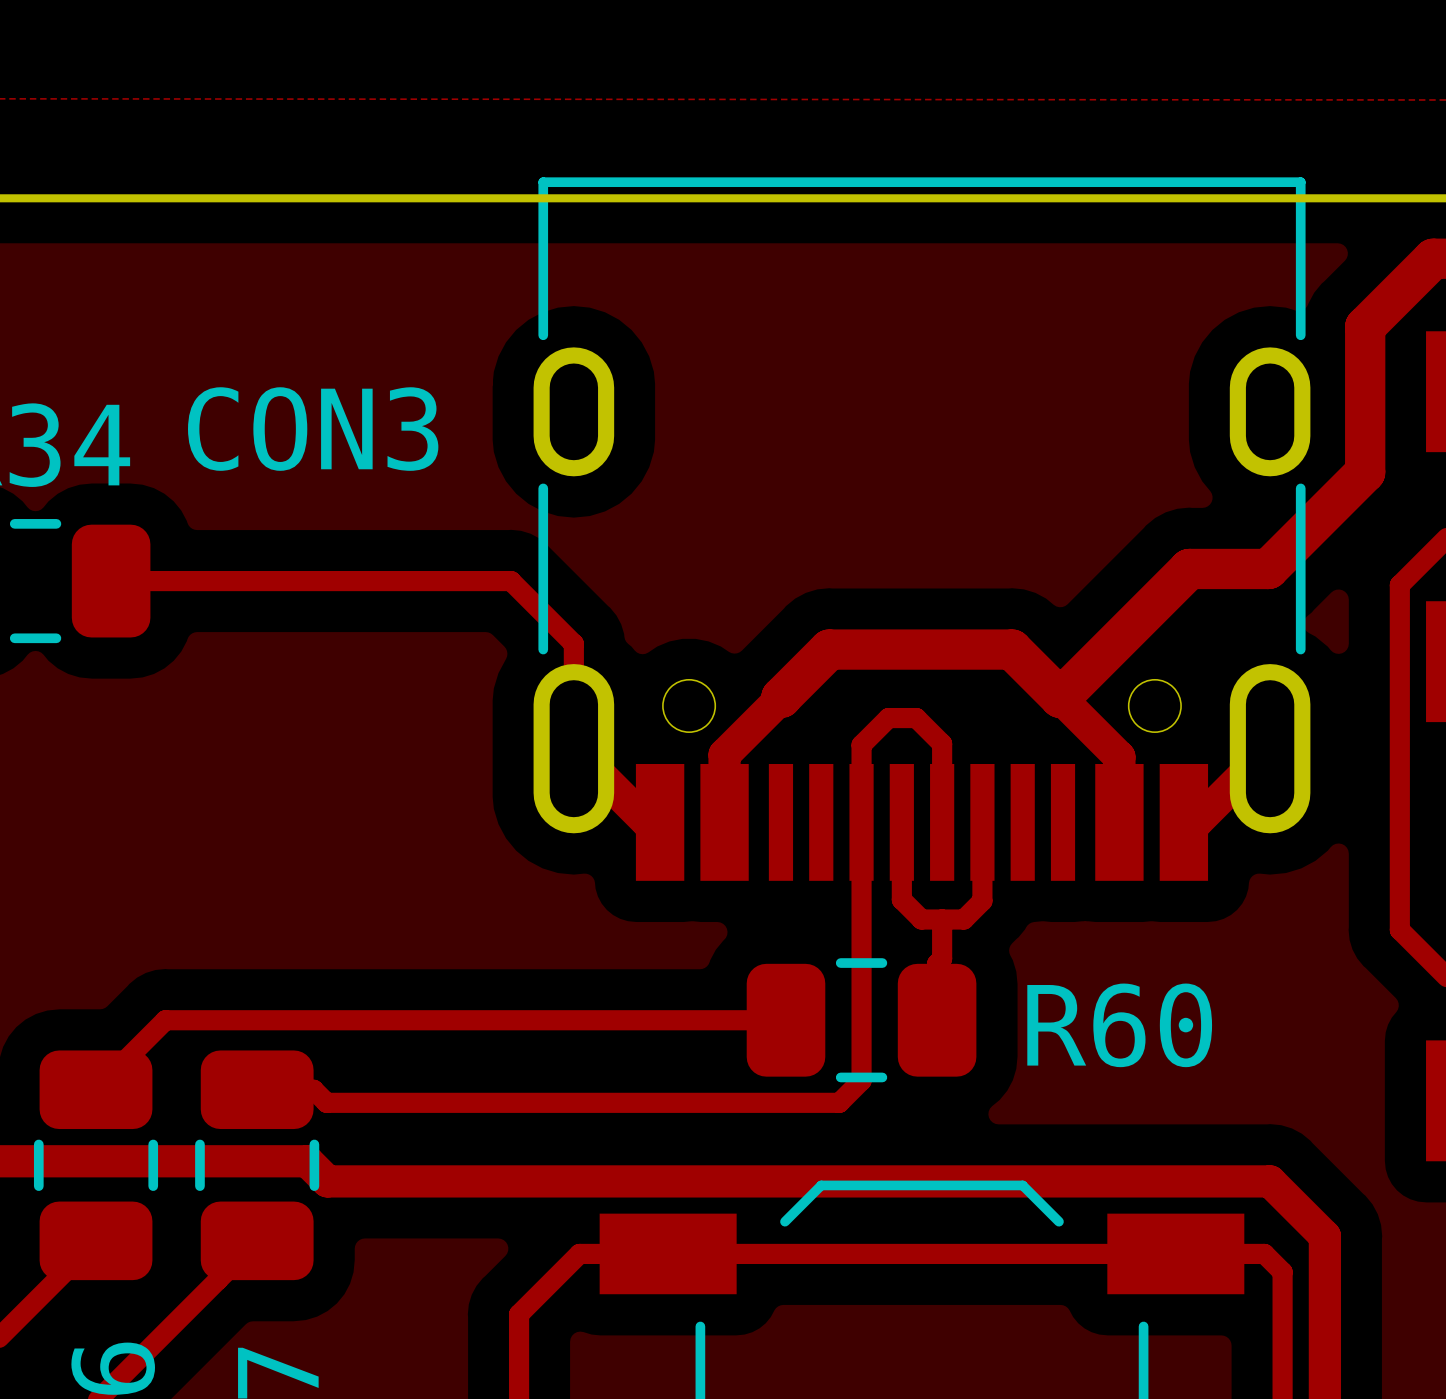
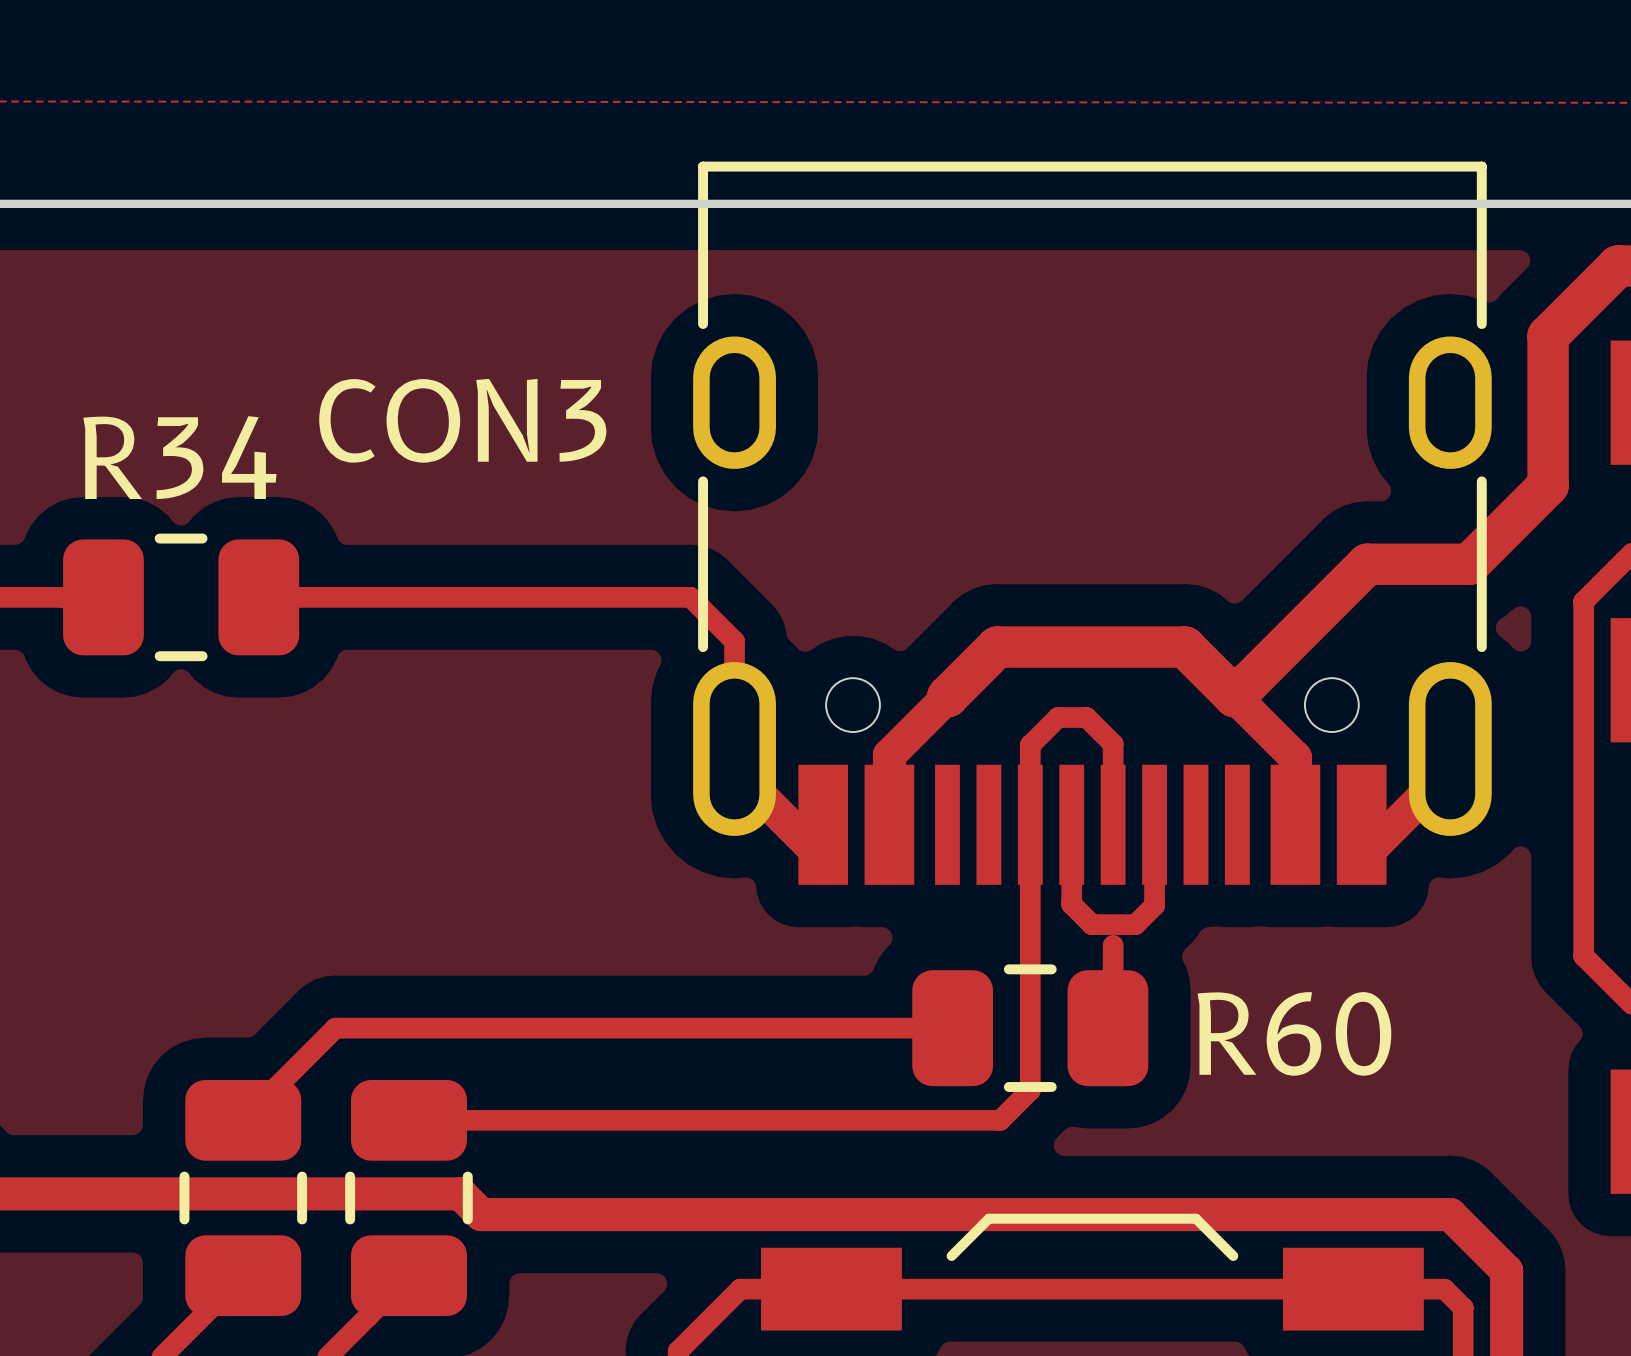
CON3 position: (921, 529) -> (1092, 523)
track: (1288, 548) (1268, 568) (1189, 568) (1060, 697) -> (1469, 564) (1367, 564) (1234, 696)
track: (511, 581) (573, 643) -> (669, 597) (690, 597) (734, 641) (734, 662)
track: (1060, 697) (1119, 756) -> (1234, 696) (1295, 757) (1295, 778)
track: (1060, 697) (1011, 649) (829, 649) (724, 754) -> (1234, 696) (1184, 647) (997, 647) (889, 755) (889, 775)
track: (942, 743) (916, 718) (888, 718) (861, 745) -> (1113, 764) (1113, 744) (1086, 717) (1058, 717) (1030, 745) (1030, 765)
track: (901, 879) (901, 899) (921, 919) (963, 919) (982, 900) (982, 880) -> (1071, 904) (1092, 924) (1135, 924) (1154, 905)
track: (165, 1020) (786, 1020) -> (314, 1048) (335, 1028) (952, 1028)
R60 position: (861, 1020) -> (1030, 1028)
track: (861, 1060) (861, 1080) (839, 1102) (326, 1102) (313, 1089) -> (1030, 1090) (1000, 1120) (466, 1120)

